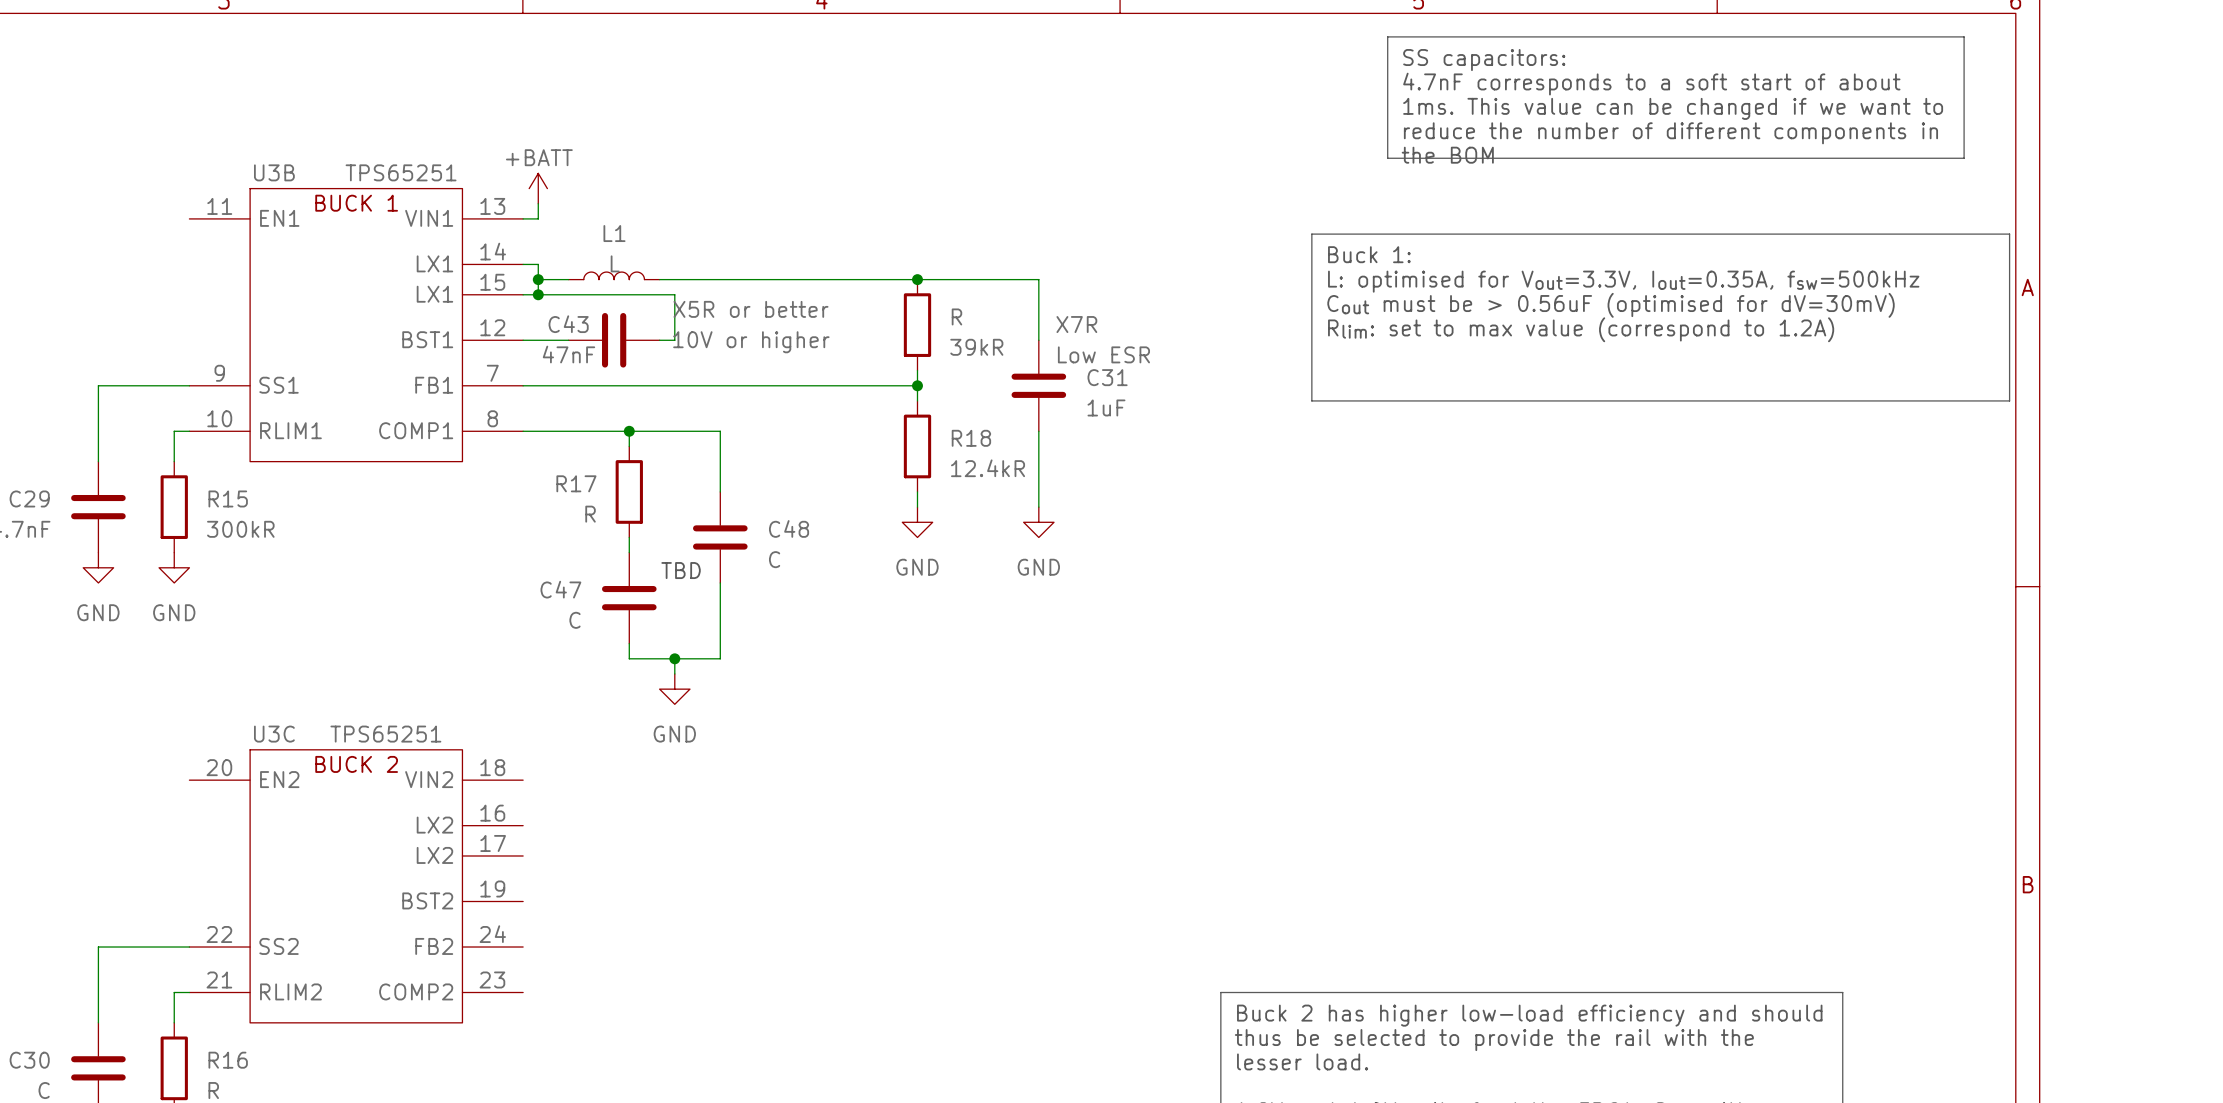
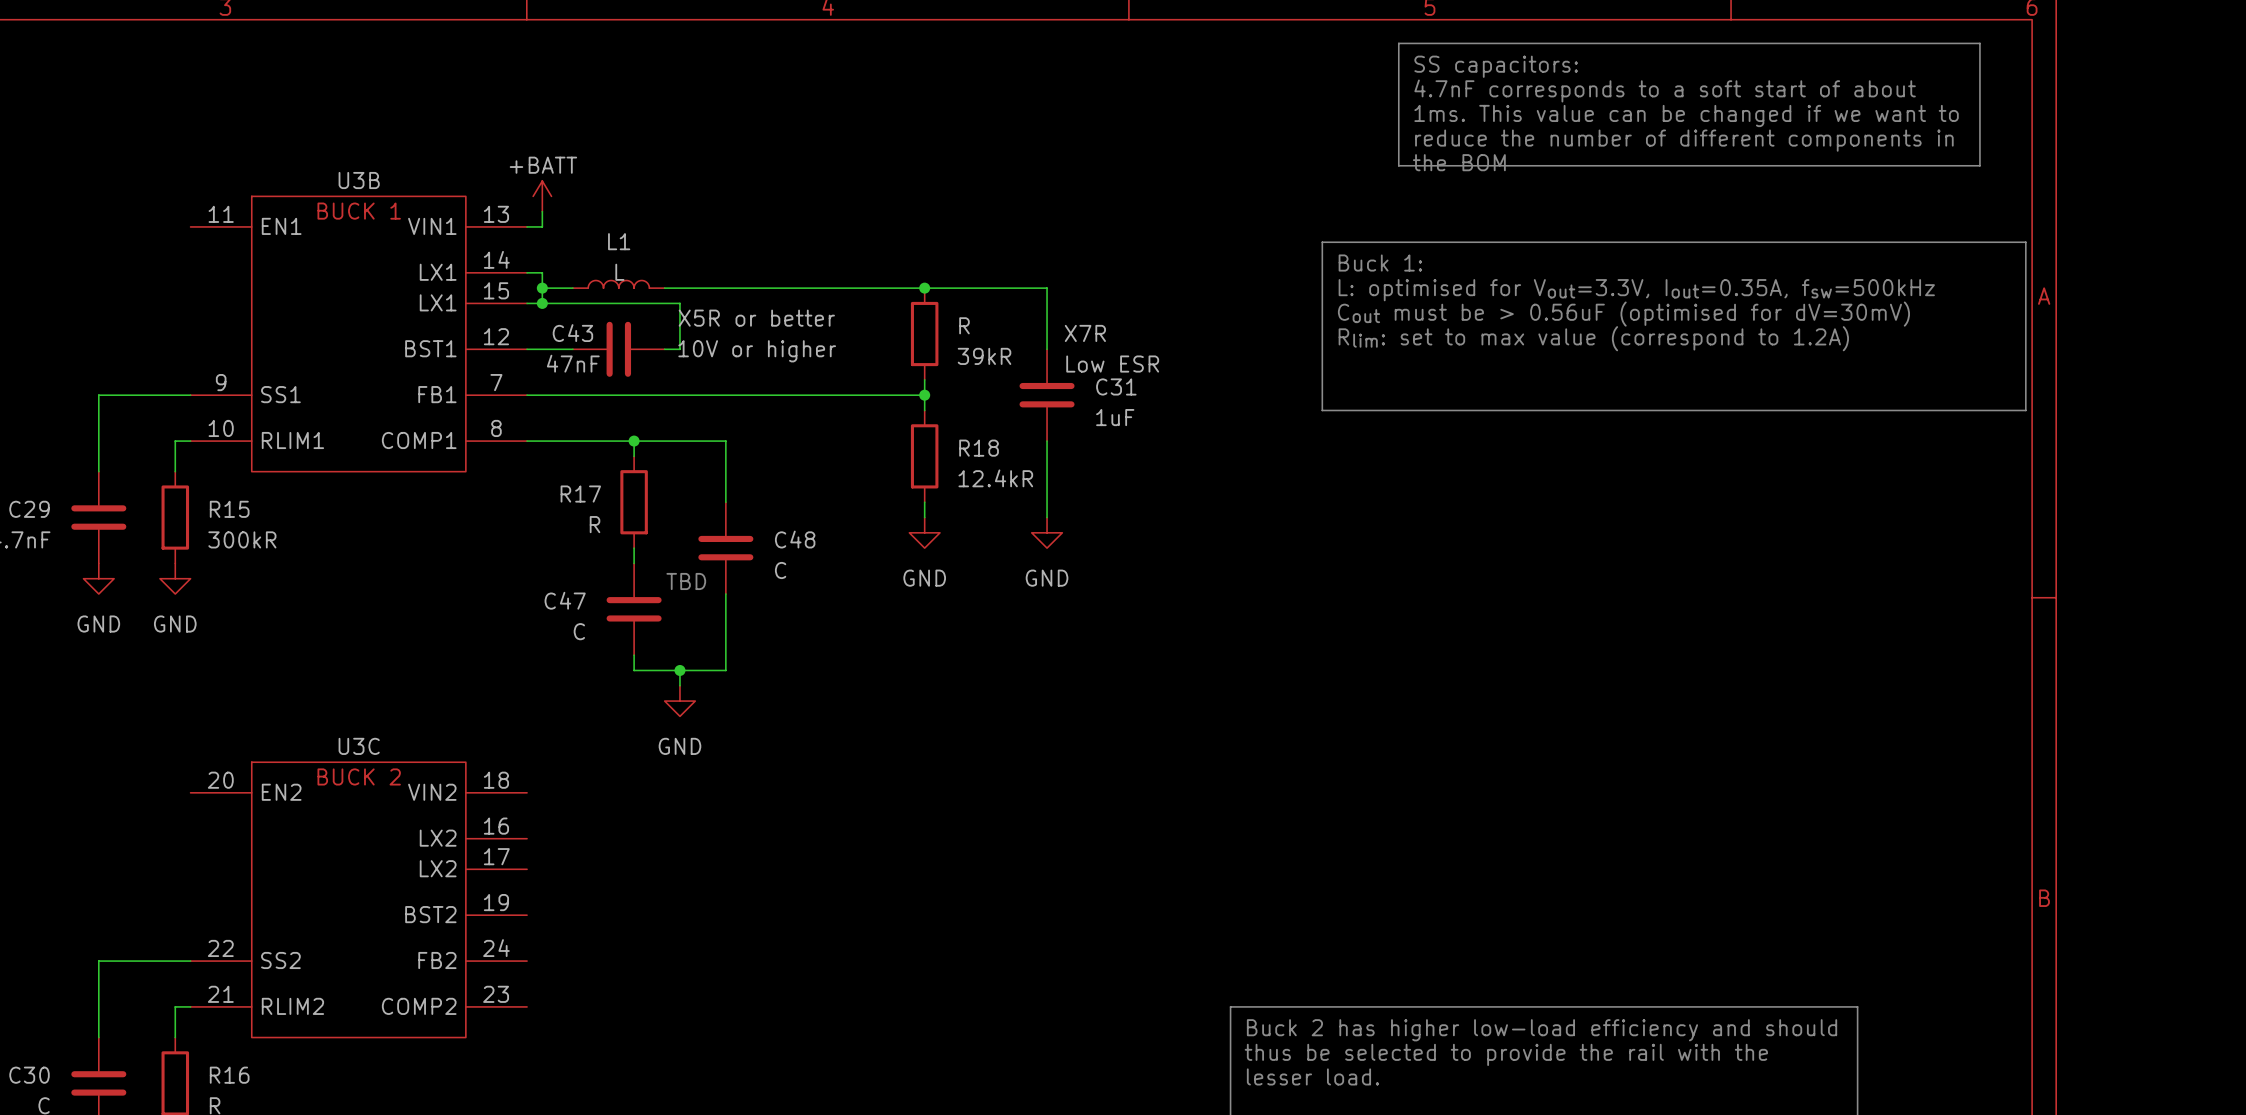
U3B name position: U3B (274, 172) -> U3B (359, 180)
U3B value: TPS65251 (401, 172) -> none
U3C name position: U3C (274, 734) -> U3C (359, 746)
U3C value: TPS65251 (385, 734) -> none

